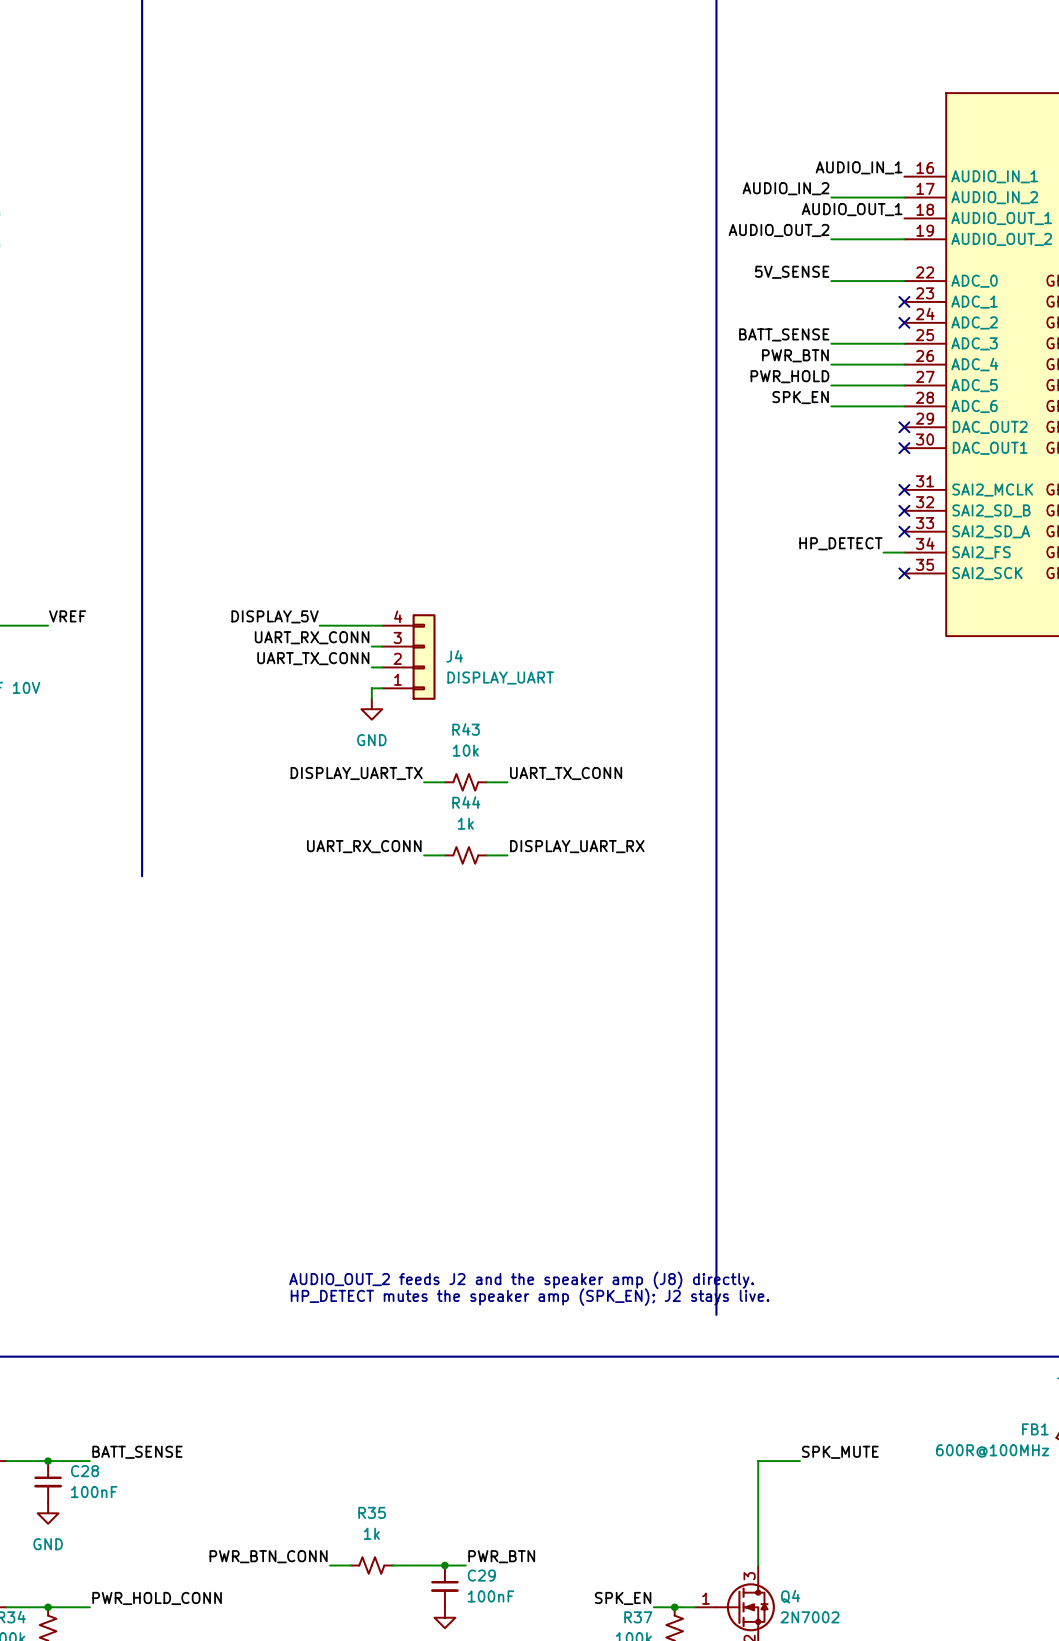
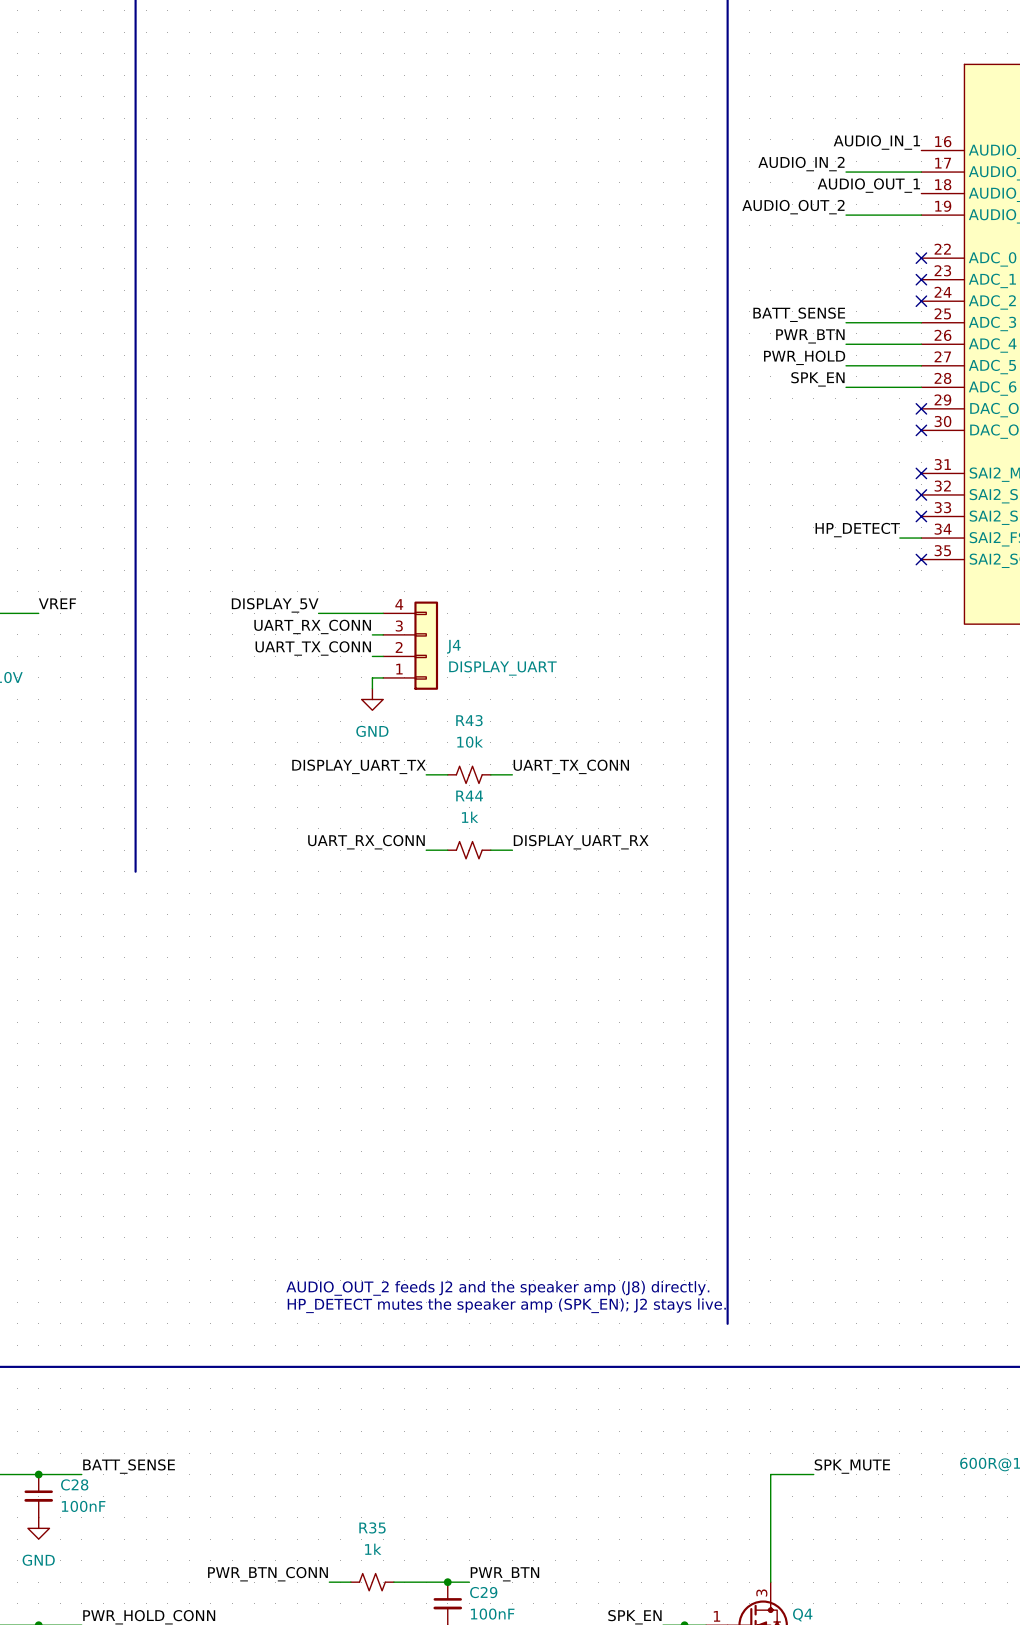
label: 5V_SENSE (792, 272) -> none
wire: (831, 281) (904, 281) -> none
no-connect mark: none -> (921, 258)

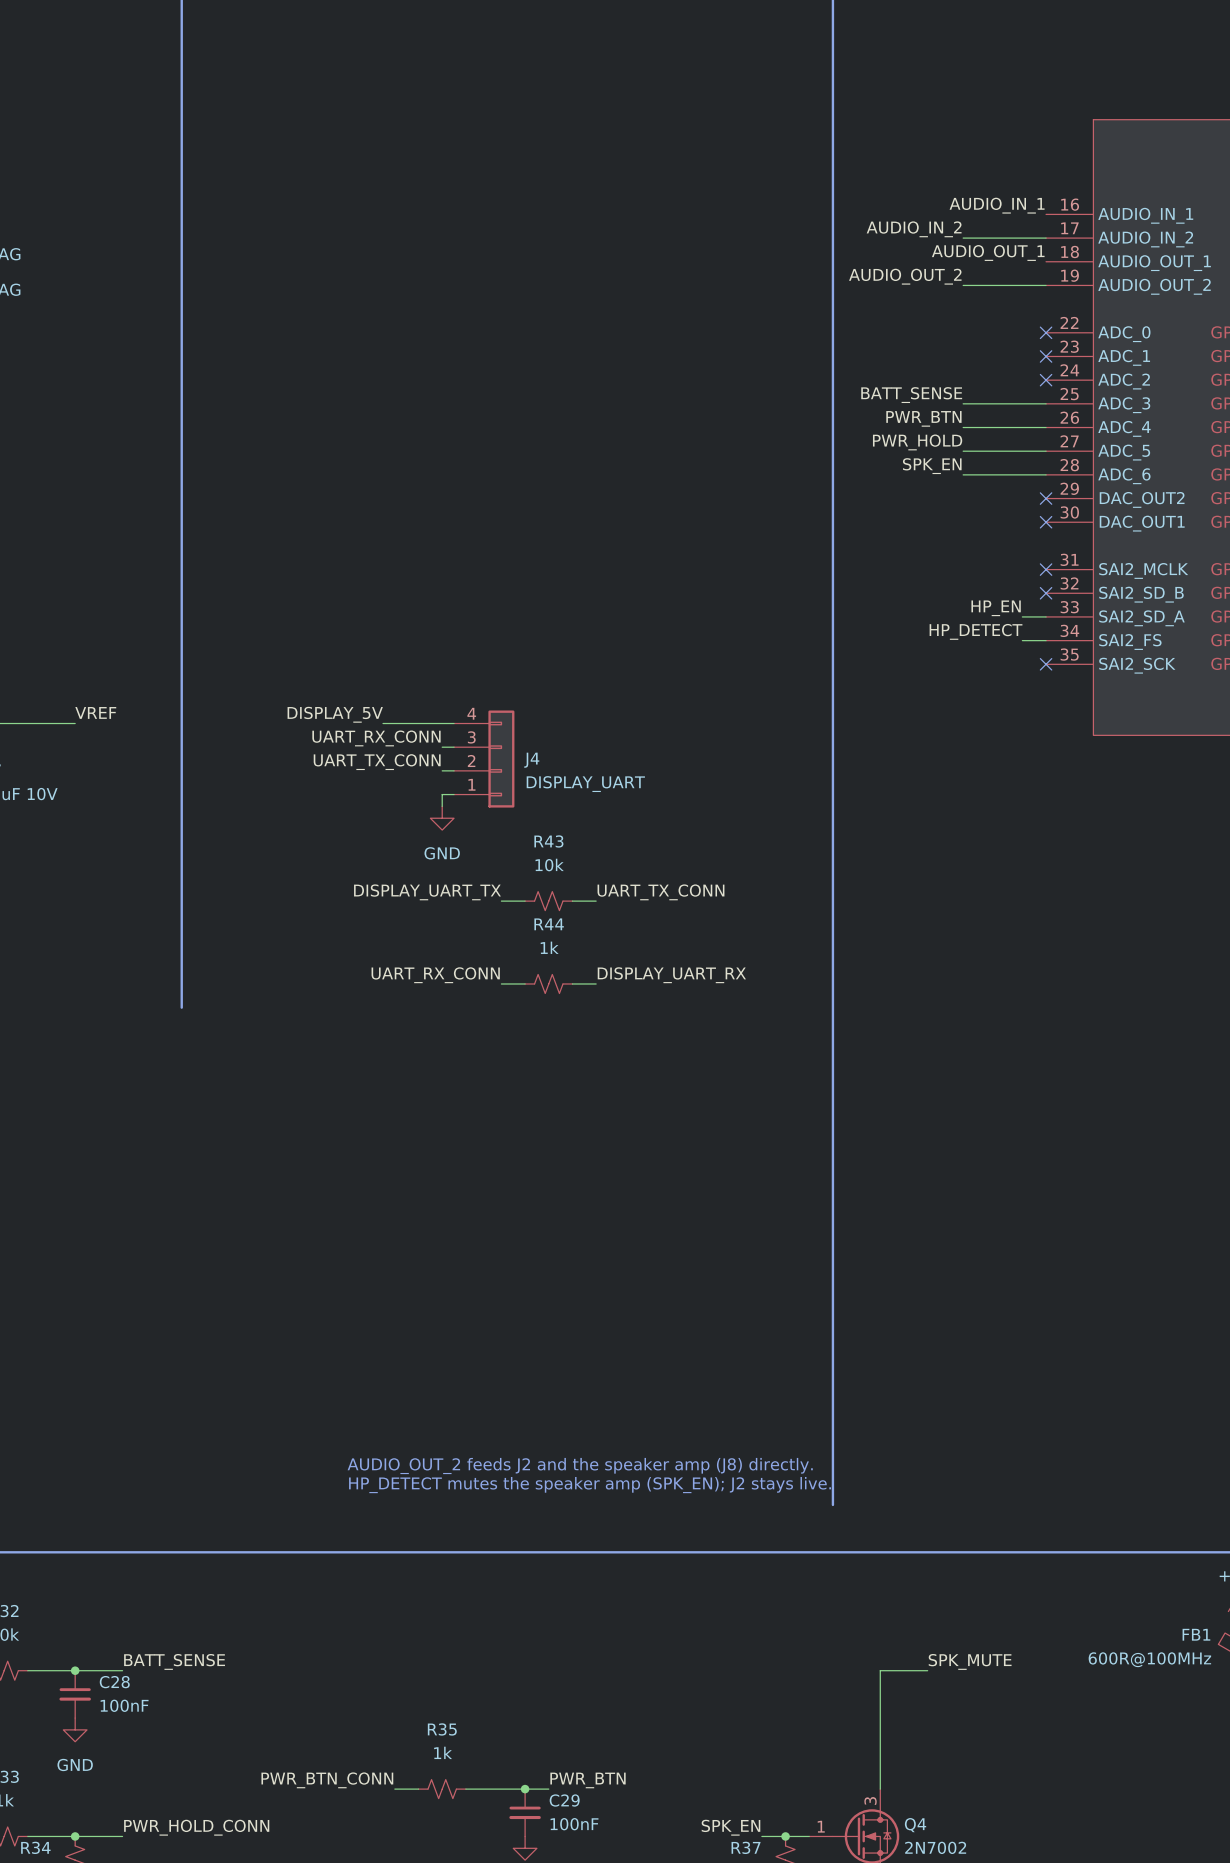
label: none -> HP_EN (996, 608)
wire: none -> (1022, 616) (1046, 616)
no-connect mark: (921, 516) -> none

